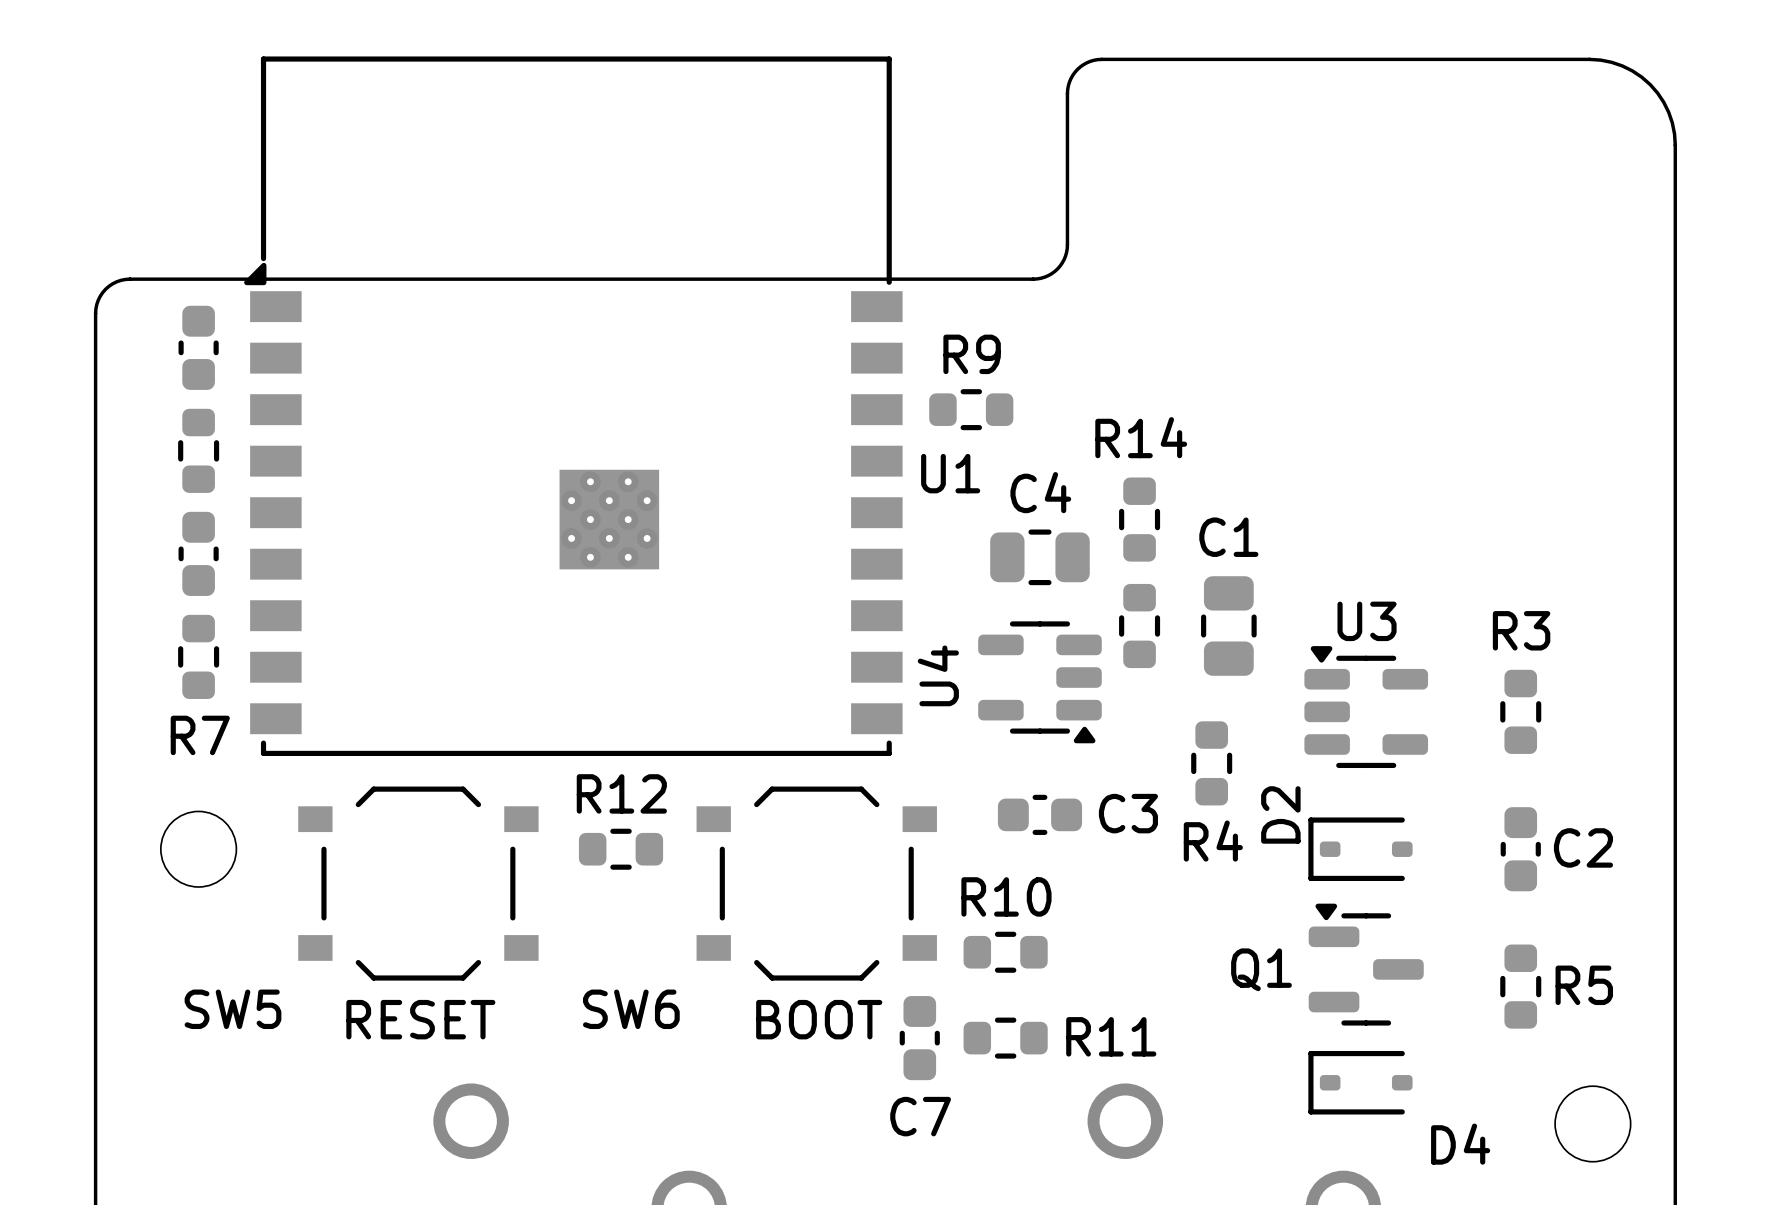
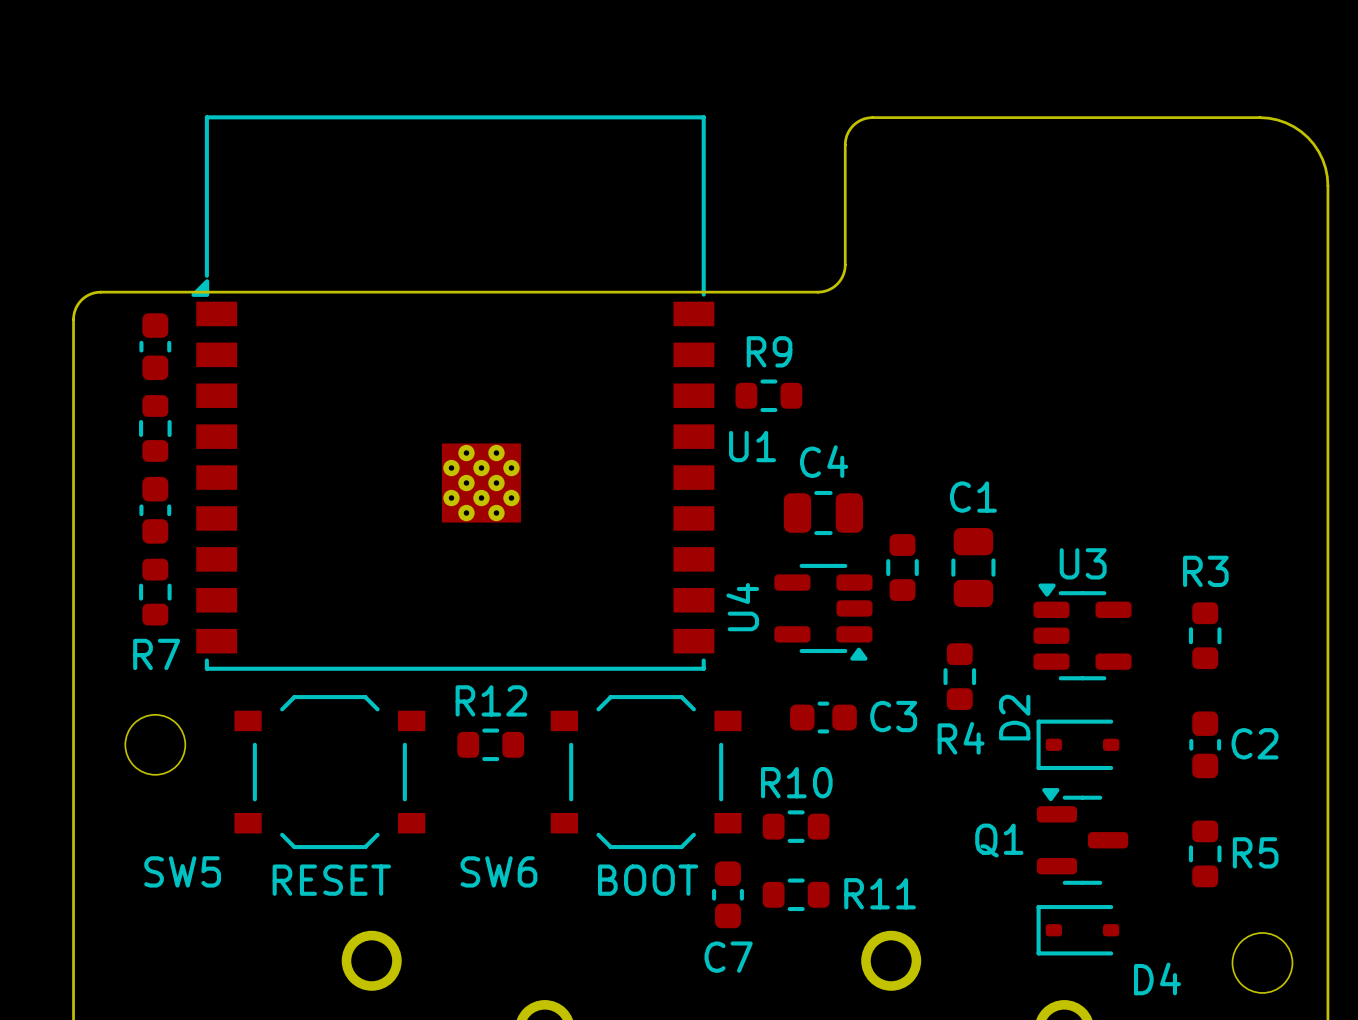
R14: (1139, 519) -> none

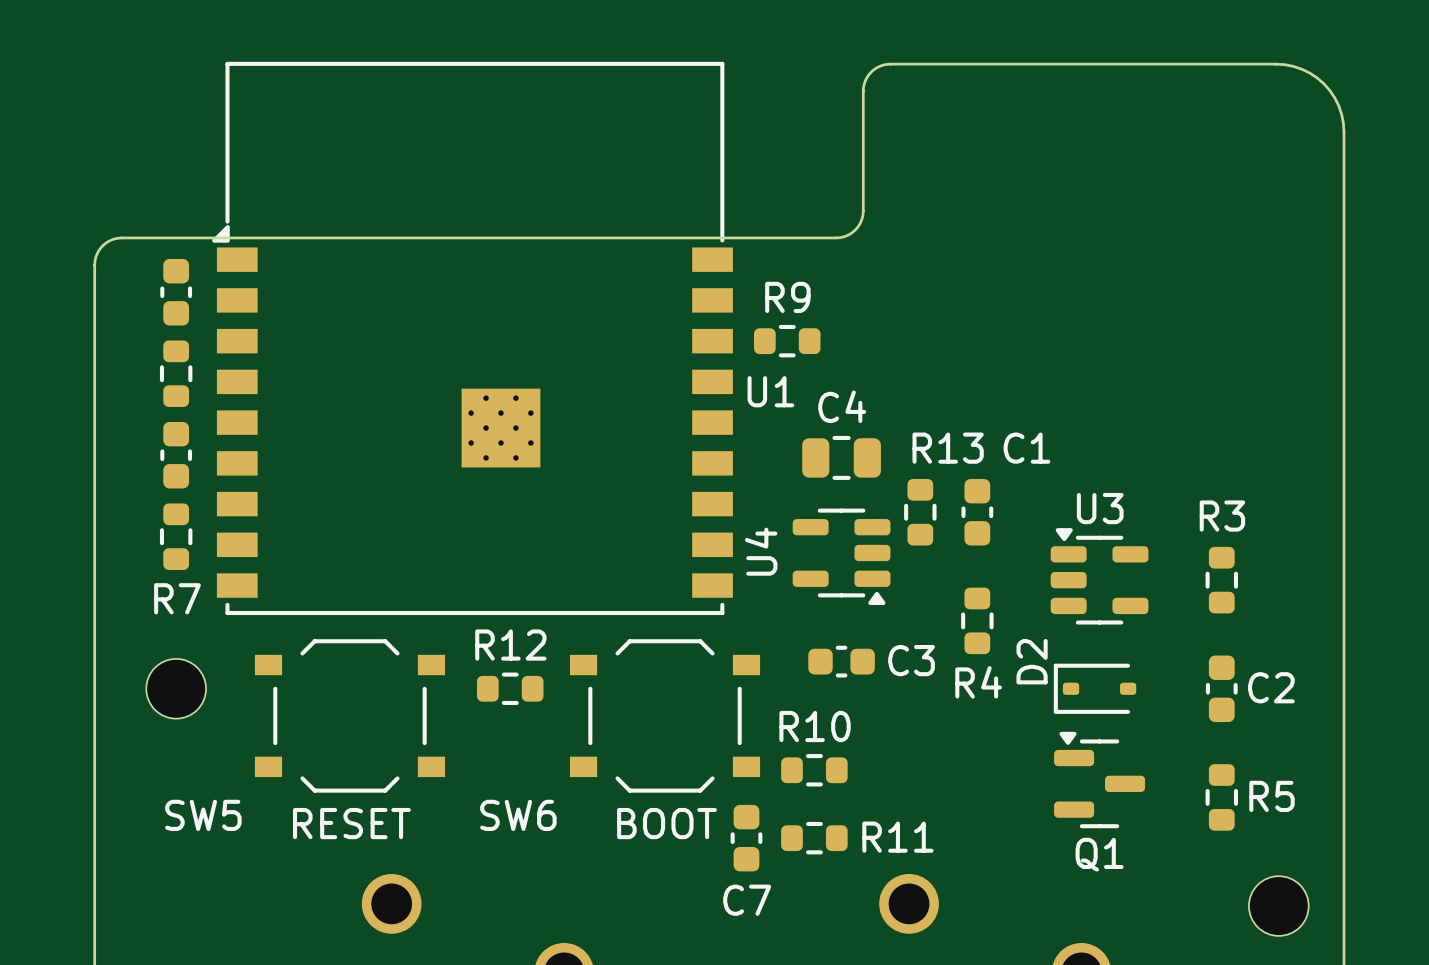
C1 name position: C1 (973, 497) -> C1 (1026, 448)
R13 name: none -> R13 (948, 448)
C1 footprint: [951, 528, 996, 608] -> [961, 478, 994, 546]
Q1 name position: Q1 (999, 840) -> Q1 (1099, 854)
D4: (1077, 930) -> none

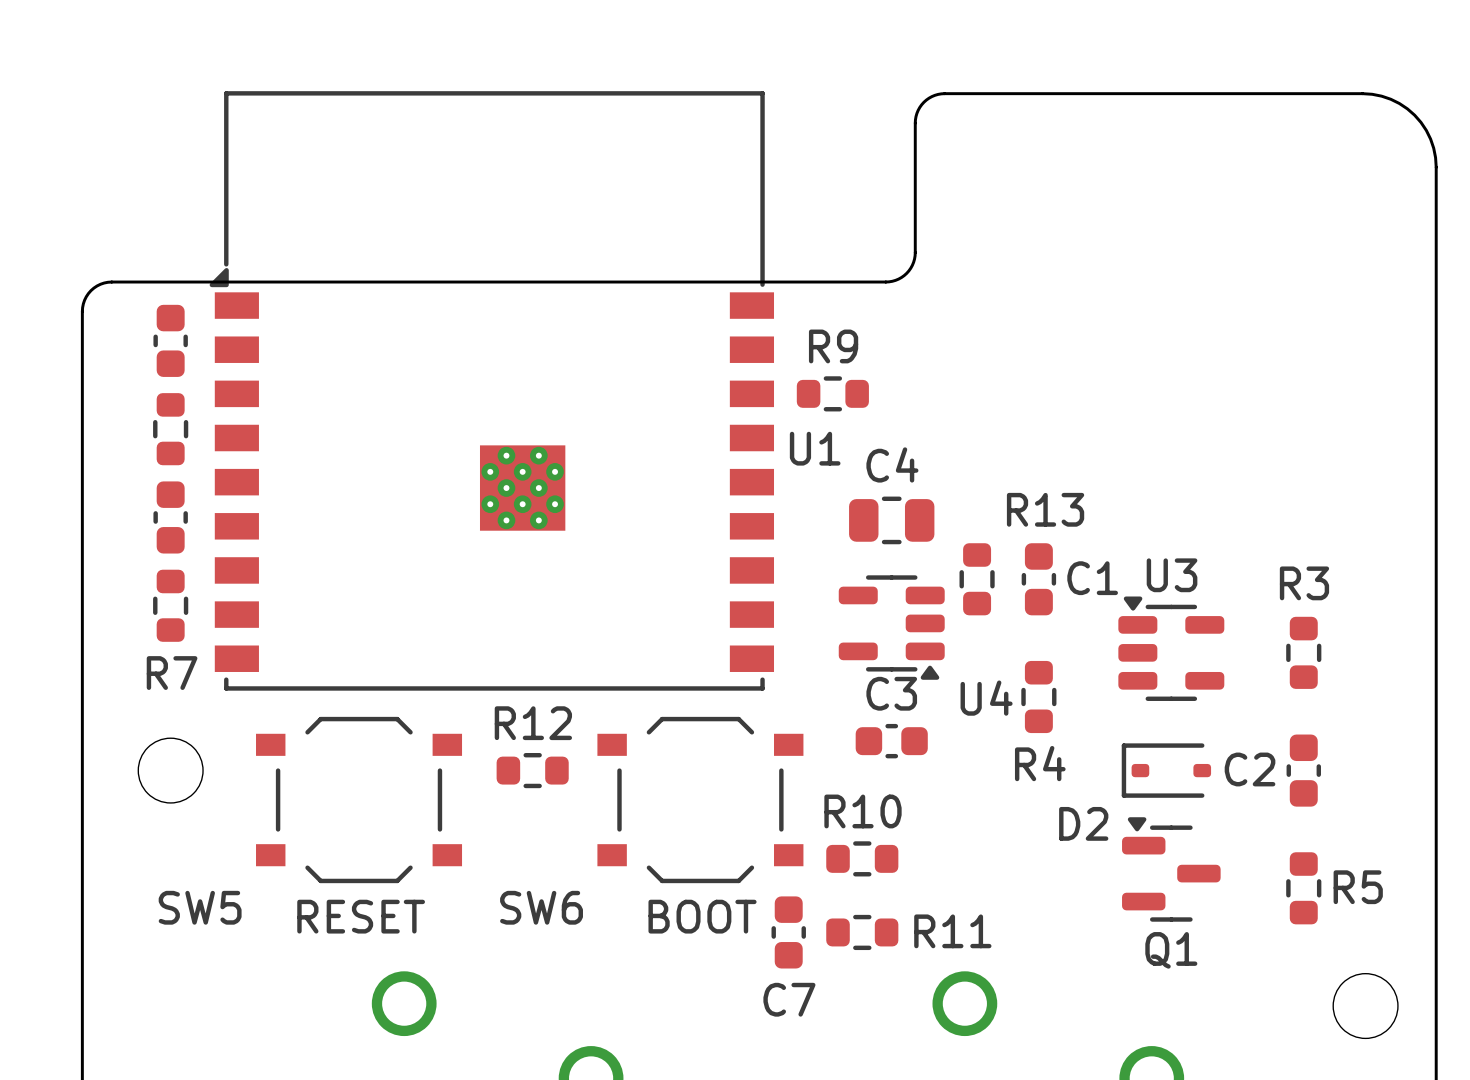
R13 name position: R13 (948, 448) -> R13 (1045, 509)
C1 name position: C1 (1026, 448) -> C1 (1092, 578)
U4 name rotation: 0° (761, 551) -> 90° clockwise (986, 698)
U4 name position: U4 (761, 551) -> U4 (986, 698)
C3 name position: C3 (911, 660) -> C3 (891, 693)
D2 name rotation: 0° (1032, 661) -> 90° clockwise (1083, 823)
D2 name position: D2 (1032, 661) -> D2 (1083, 823)
C2 name position: C2 (1271, 687) -> C2 (1250, 769)

